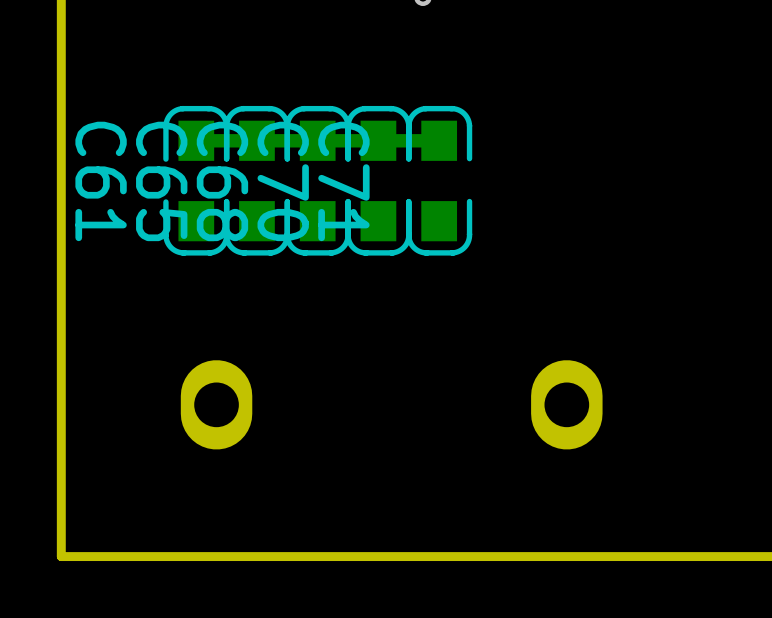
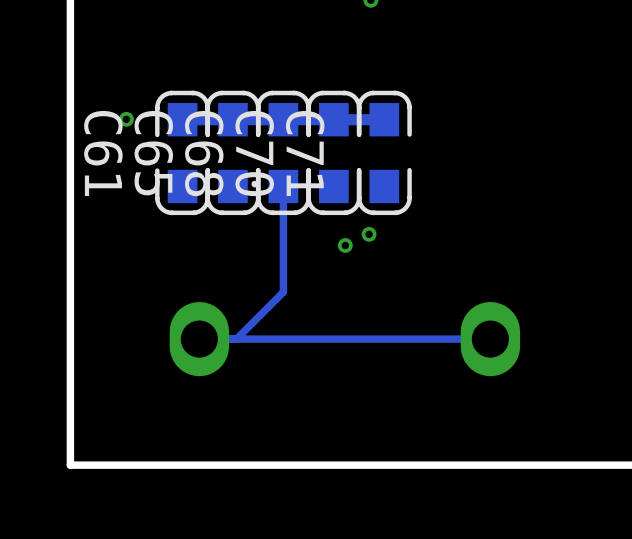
via: none -> (126, 119)
track: none -> (283, 186) (283, 292) (236, 339)
via: none -> (369, 234)
via: none -> (345, 245)
track: none -> (490, 339) (199, 339)

